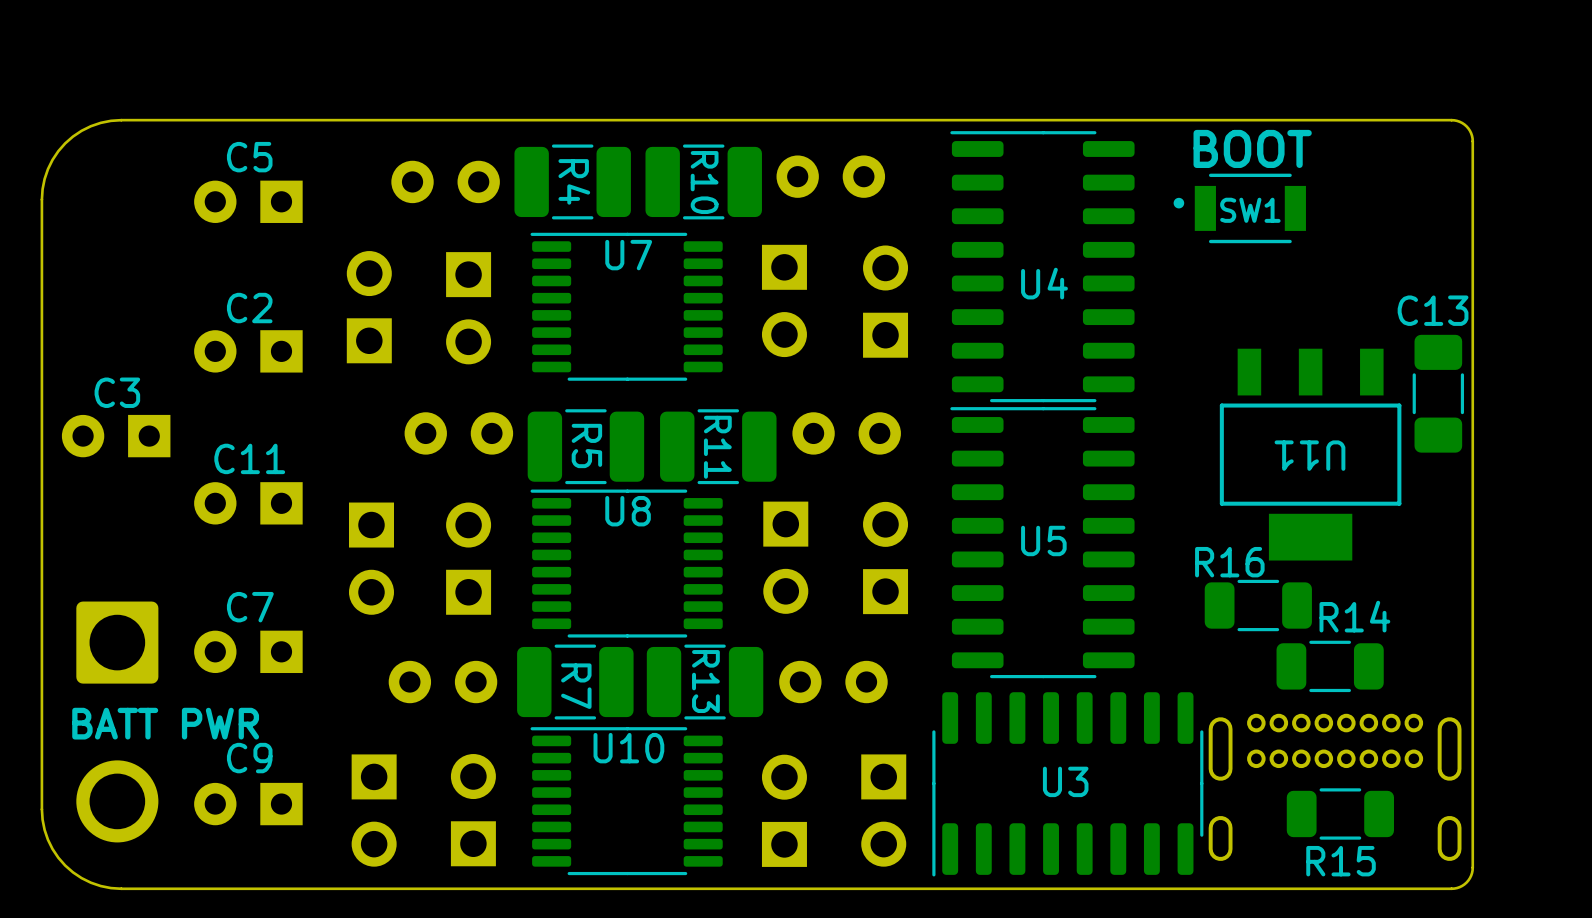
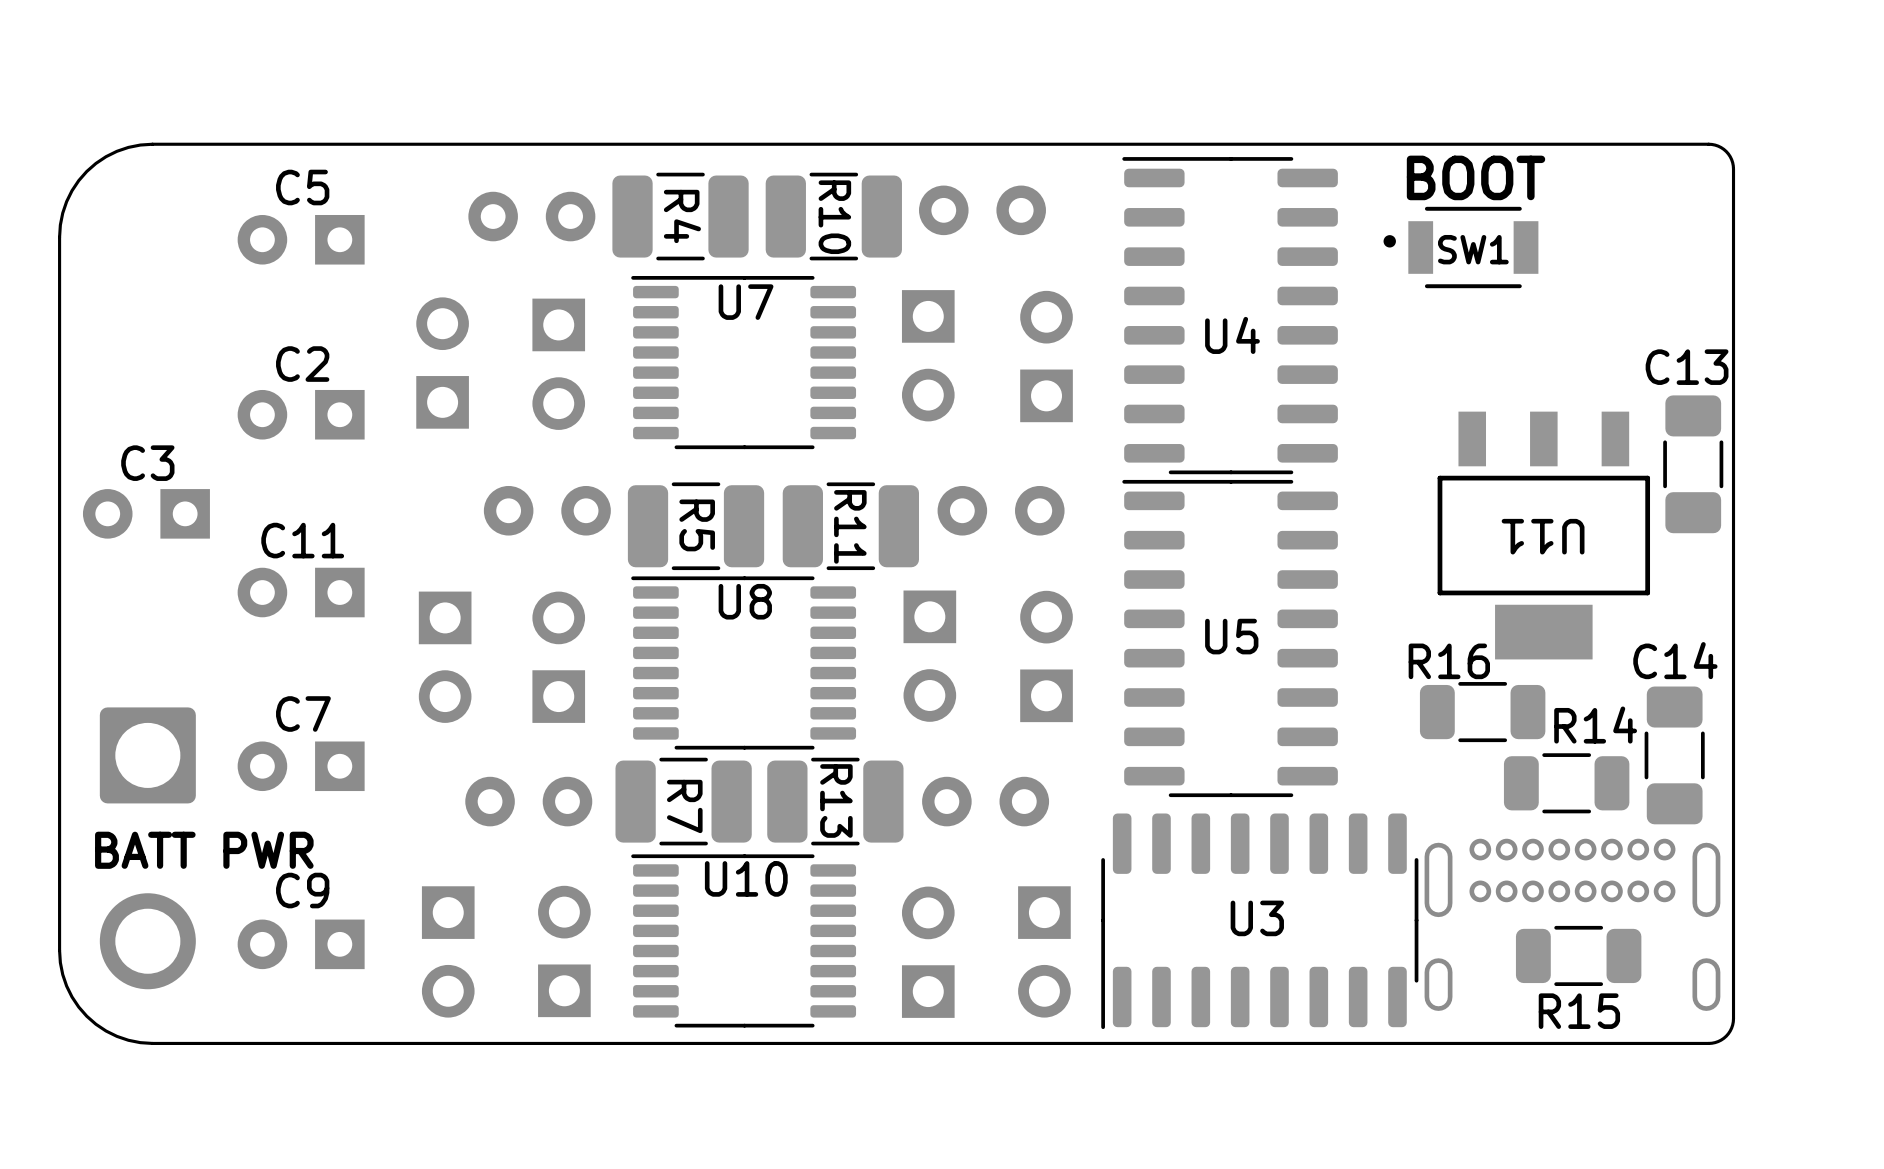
C14: none -> (1674, 755)

